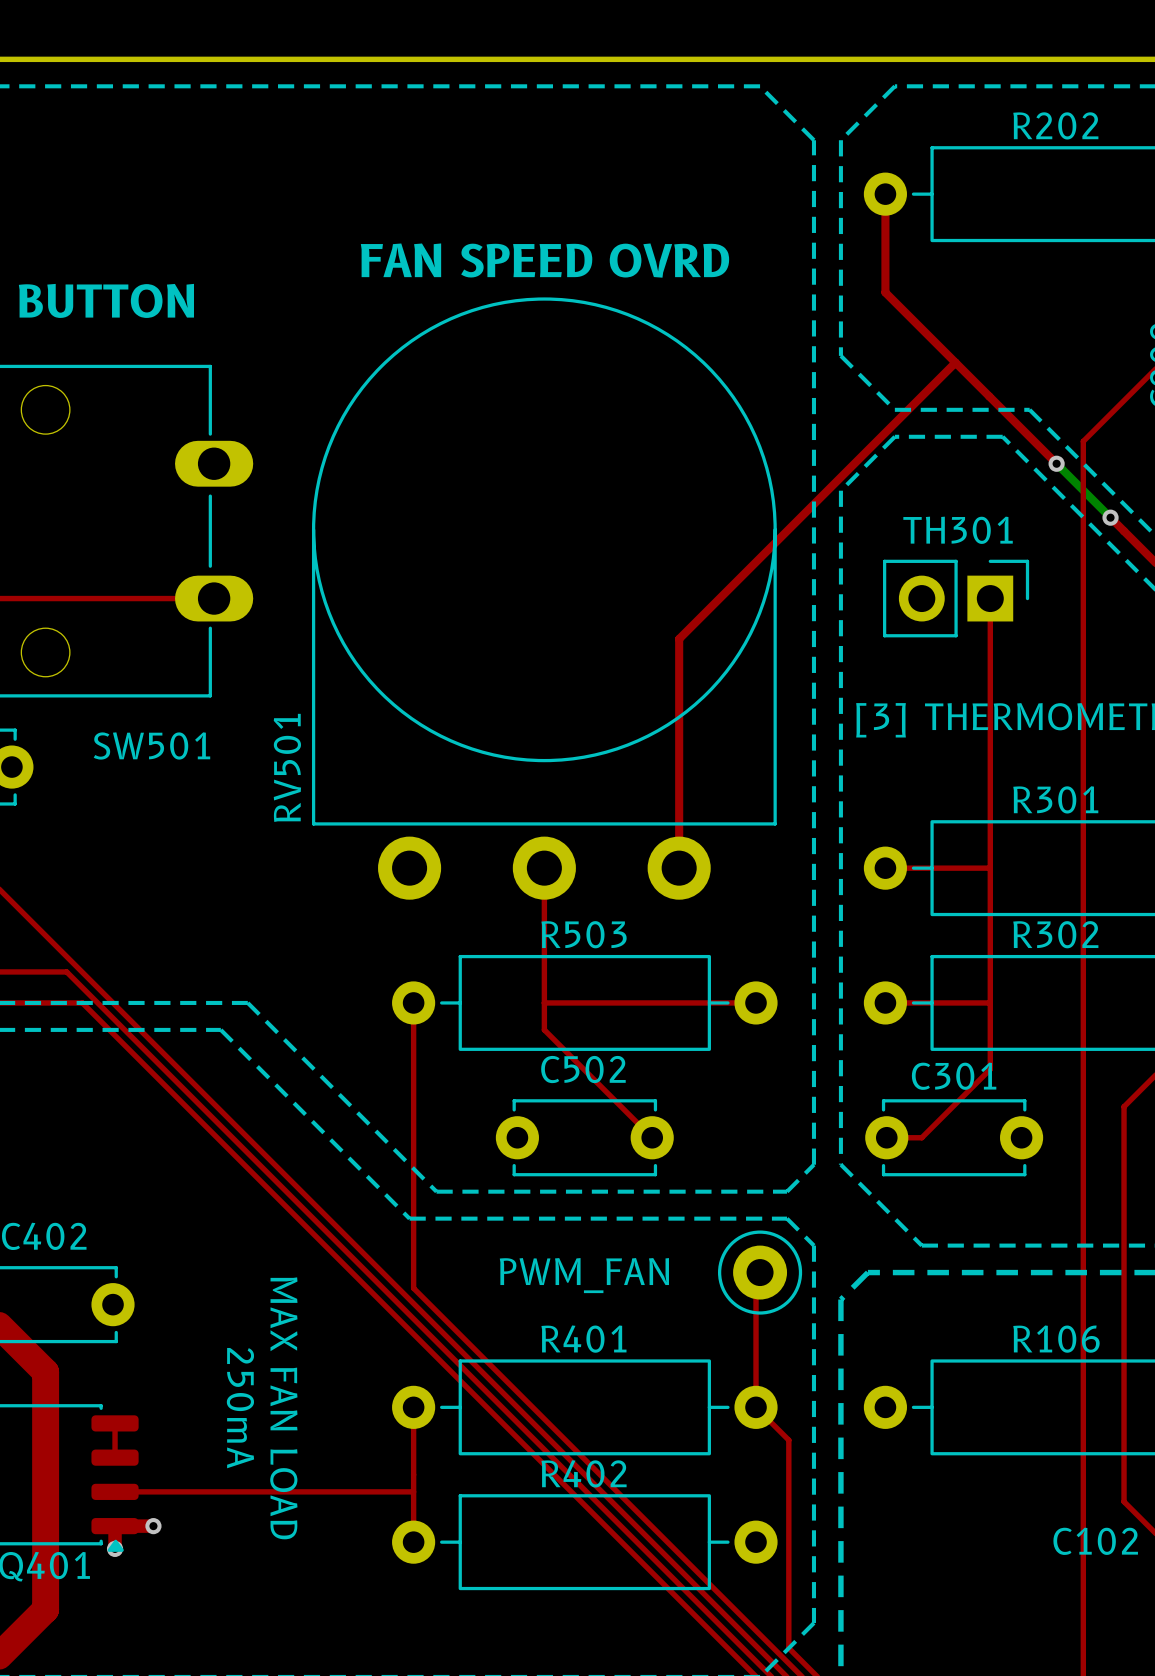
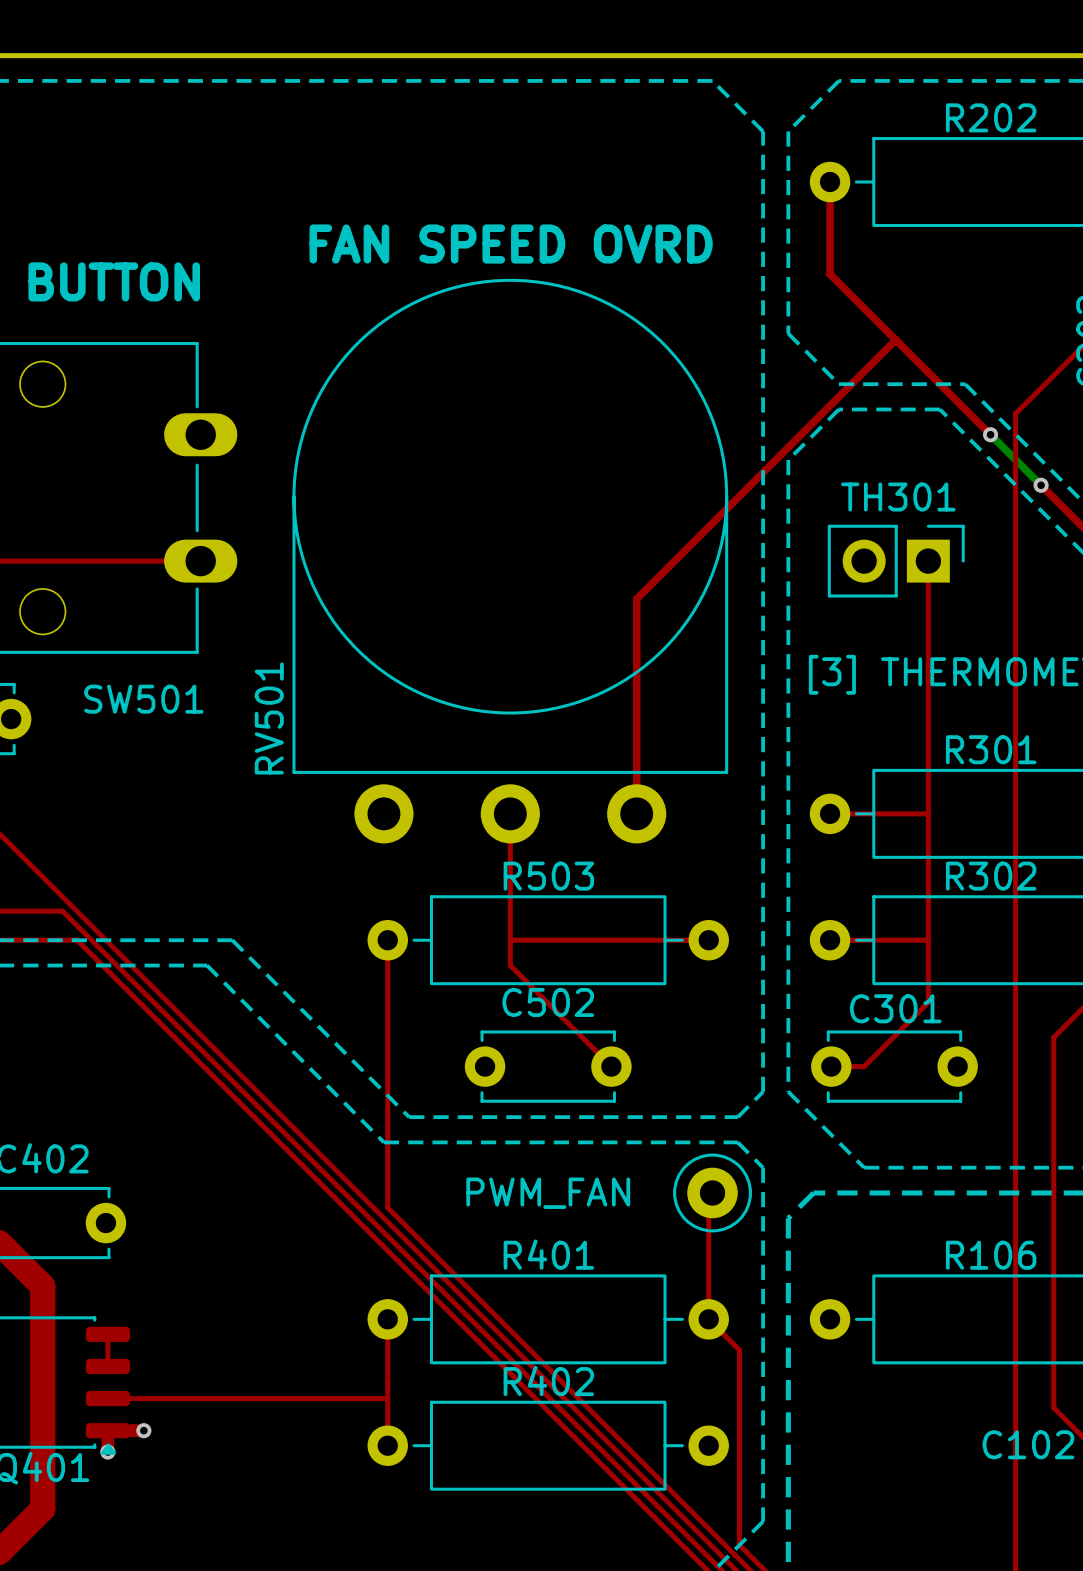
text: 250mA (240, 1408) -> none
text: MAX FAN LOAD (283, 1408) -> none

